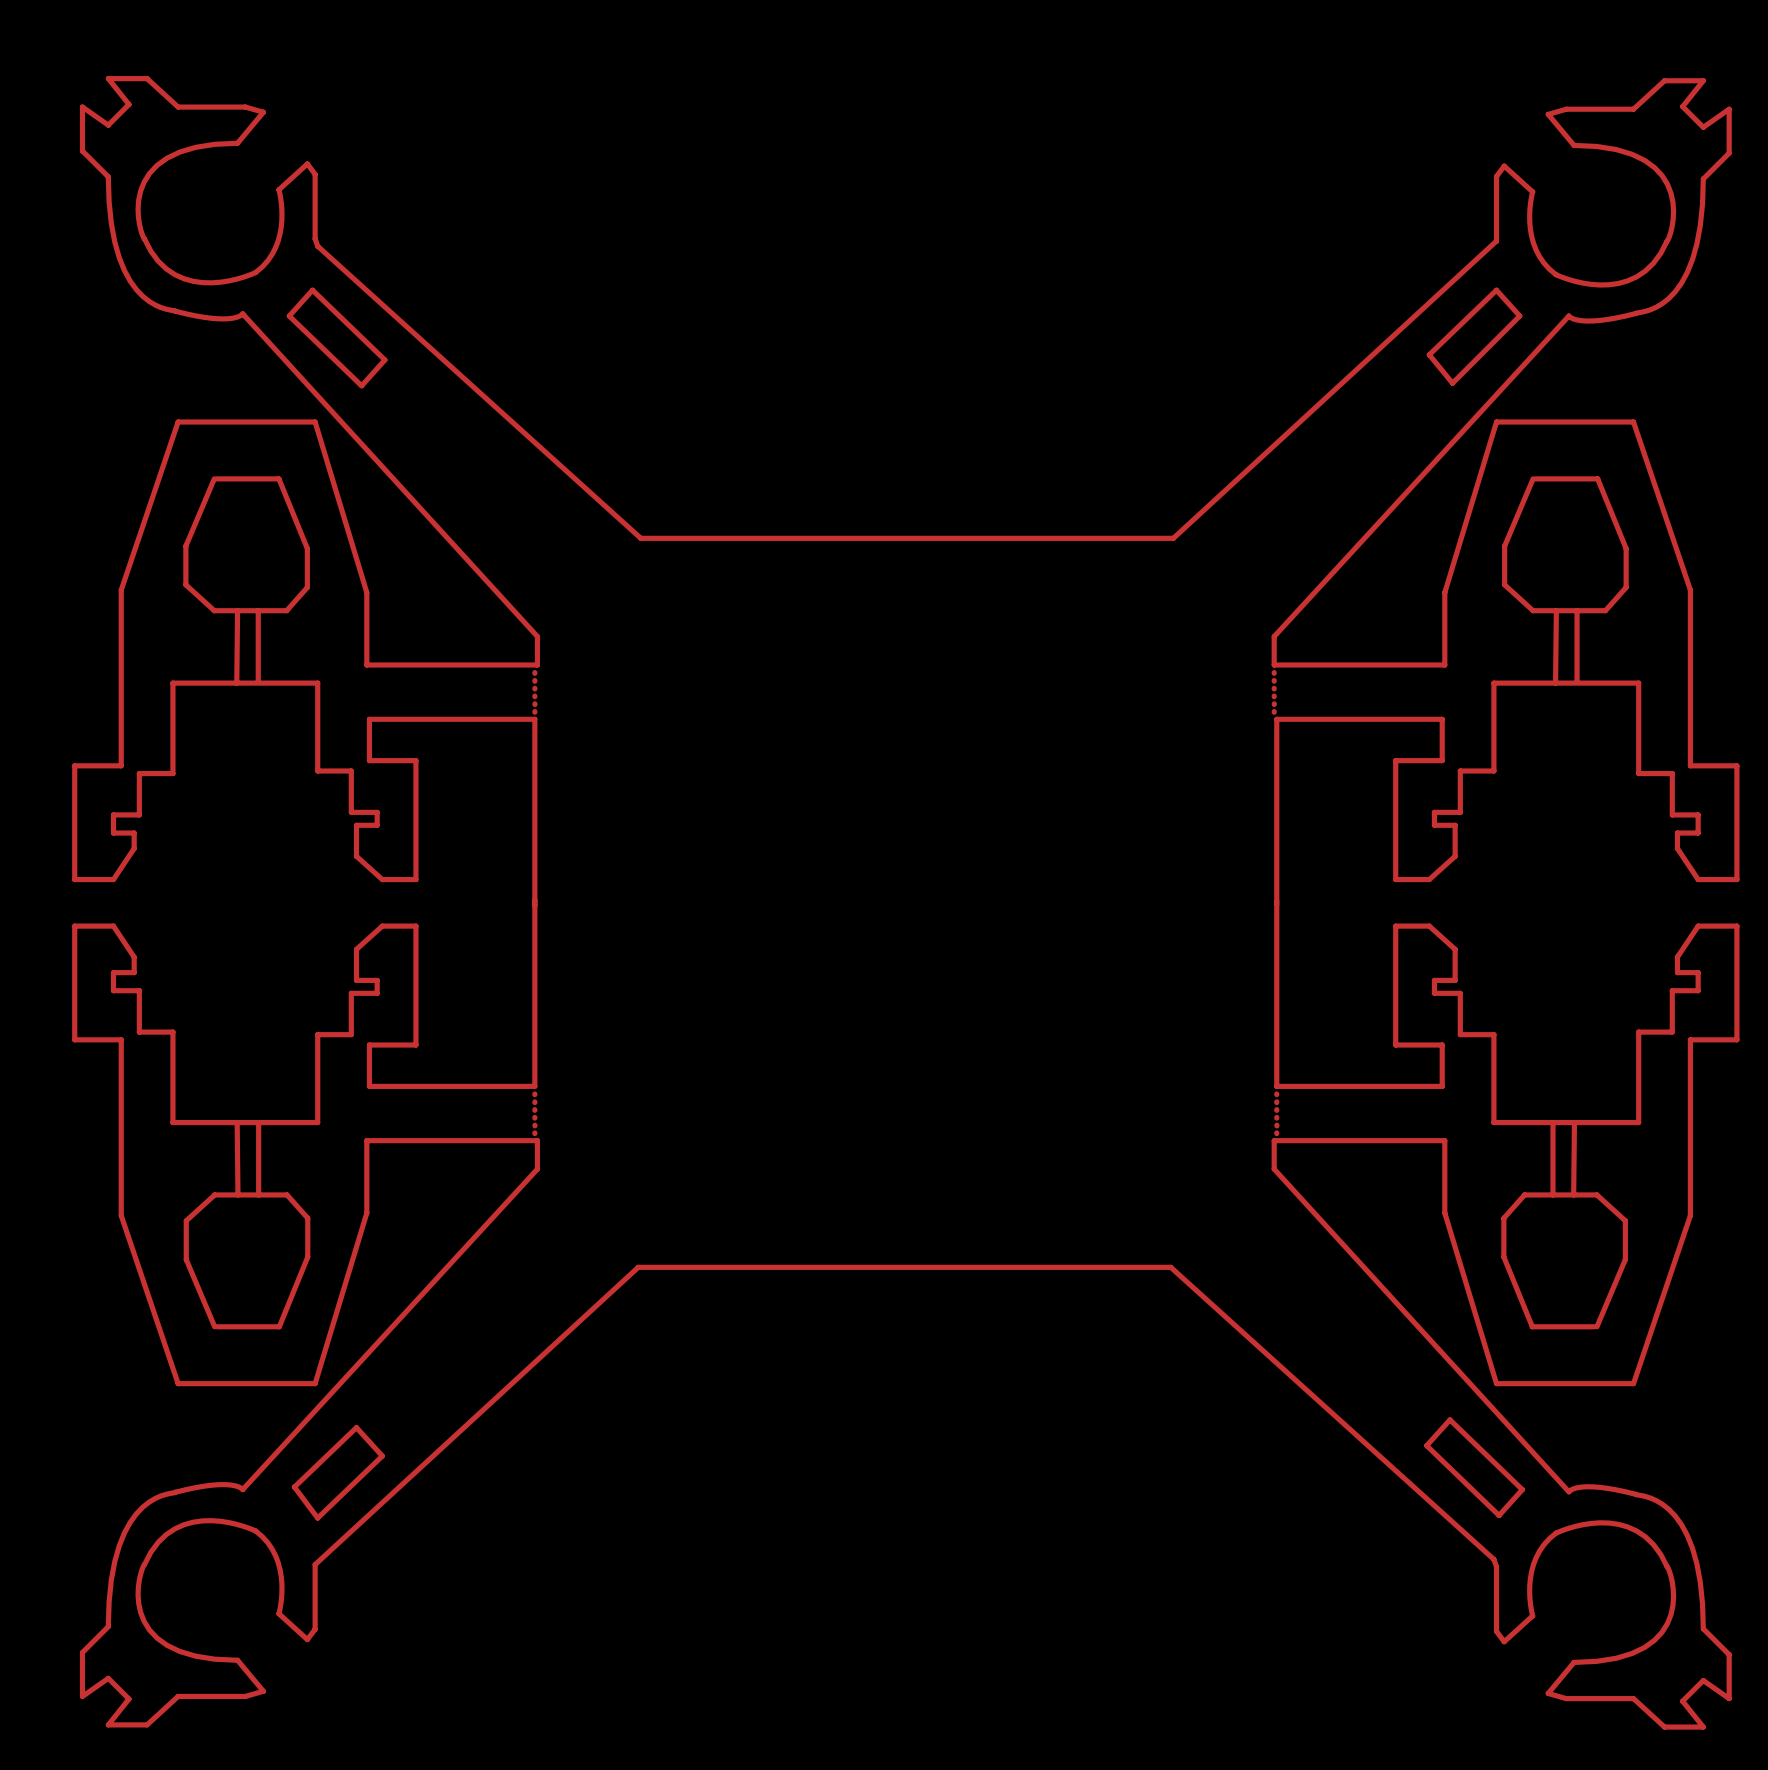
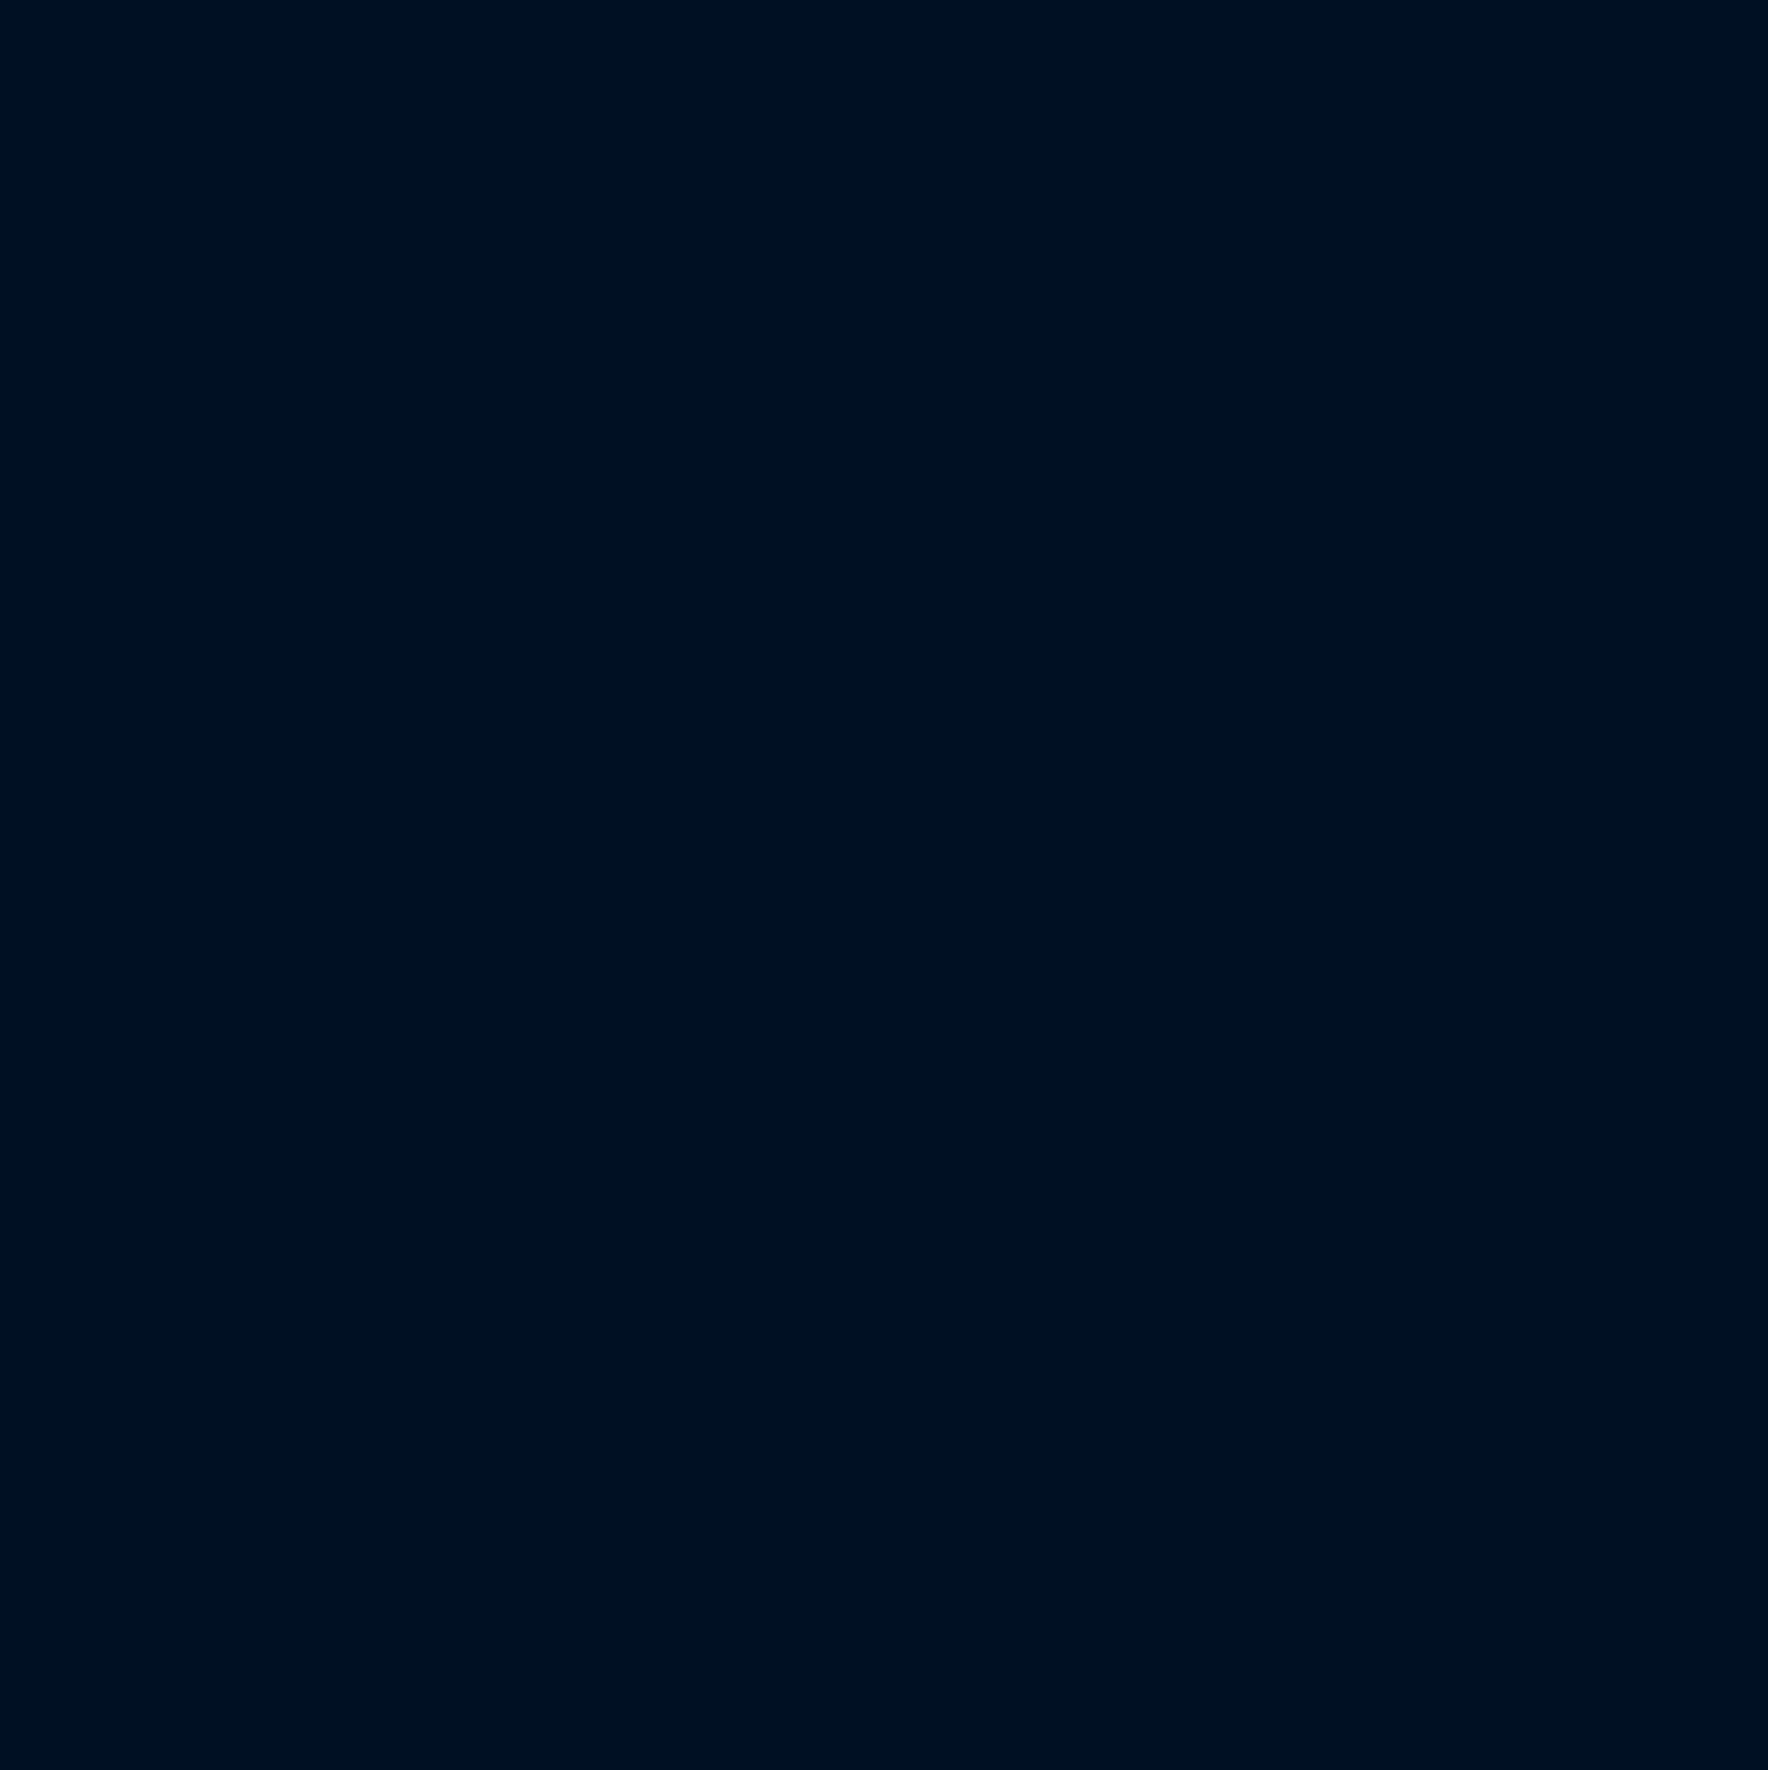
track: (108, 78) (147, 78) (178, 107) (245, 107) (263, 112) (237, 143) (214, 144) (179, 152) (157, 165) (144, 182) (138, 208) (140, 230) (150, 251) (166, 268) (184, 278) (202, 282) (228, 280) (255, 272) (267, 260) (278, 240) (282, 214) (278, 189) (307, 163) (315, 174) (315, 238) (317, 246) (640, 538) (1173, 538) (1496, 241) (1496, 176) (1504, 166) (1532, 191) (1529, 216) (1533, 242) (1543, 262) (1555, 274) (1582, 283) (1609, 284) (1627, 280) (1645, 271) (1660, 253) (1670, 232) (1673, 210) (1667, 184) (1654, 167) (1631, 154) (1596, 146) (1574, 145) (1548, 114) (1566, 109) (1633, 109) (1664, 80) (1703, 80) (1682, 106) (1703, 127) (1729, 109) (1729, 153) (1703, 179) (1702, 203) (1696, 243) (1687, 272) (1675, 291) (1656, 307) (1625, 316) (1588, 321) (1577, 319) (1568, 316) (1274, 636) (1274, 665) (1444, 665) (1444, 592) (1496, 422) (1633, 422) (1690, 590) (1690, 765) (1736, 765) (1736, 879) (1698, 879) (1677, 848) (1677, 833) (1698, 833) (1698, 814) (1672, 814) (1672, 773) (1638, 773) (1638, 683) (1493, 683) (1493, 770) (1460, 770) (1460, 812) (1434, 812) (1434, 825) (1455, 825) (1455, 856) (1429, 879) (1395, 879) (1395, 760) (1442, 760) (1442, 719) (1276, 719) (1276, 1086) (1442, 1086) (1442, 1045) (1395, 1045) (1395, 926) (1429, 926) (1455, 949) (1455, 980) (1434, 980) (1434, 993) (1460, 993) (1460, 1034) (1493, 1034) (1493, 1122) (1638, 1122) (1638, 1032) (1672, 1032) (1672, 990) (1698, 990) (1698, 972) (1677, 972) (1677, 957) (1698, 926) (1736, 926) (1736, 1039) (1690, 1039) (1690, 1215) (1633, 1383) (1496, 1383) (1444, 1213) (1444, 1140) (1274, 1140) (1274, 1169) (1568, 1491) (1577, 1487) (1588, 1486) (1625, 1491) (1656, 1500) (1675, 1515) (1687, 1535) (1696, 1563) (1702, 1603) (1703, 1628) (1729, 1654) (1729, 1698) (1703, 1680) (1682, 1701) (1703, 1727) (1664, 1727) (1633, 1698) (1566, 1698) (1548, 1693) (1574, 1662) (1596, 1661) (1631, 1653) (1654, 1640) (1667, 1623) (1673, 1597) (1670, 1575) (1660, 1554) (1645, 1536) (1627, 1526) (1609, 1523) (1582, 1524) (1555, 1533) (1543, 1544) (1533, 1564) (1529, 1591) (1532, 1615) (1504, 1641) (1496, 1631) (1496, 1566) (1493, 1559) (1170, 1267) (638, 1267) (315, 1564) (315, 1629) (307, 1639) (278, 1613) (282, 1589) (278, 1562) (267, 1542) (255, 1531) (228, 1522) (202, 1520) (184, 1524) (166, 1534) (150, 1552) (140, 1573) (138, 1594) (144, 1621) (157, 1638) (179, 1651) (214, 1659) (237, 1660) (263, 1691) (245, 1696) (178, 1696) (147, 1724) (108, 1724) (129, 1699) (108, 1678) (82, 1696) (82, 1652) (108, 1626) (109, 1601) (114, 1561) (124, 1533) (136, 1513) (155, 1498) (186, 1489) (222, 1484) (234, 1485) (242, 1489) (537, 1169) (537, 1140) (366, 1140) (366, 1213) (315, 1383) (178, 1383) (121, 1215) (121, 1039) (74, 1039) (74, 926) (113, 926) (134, 957) (134, 972) (113, 972) (113, 990) (139, 990) (139, 1032) (172, 1032) (172, 1122) (317, 1122) (317, 1034) (351, 1034) (351, 993) (377, 993) (377, 980) (356, 980) (356, 949) (382, 926) (415, 926) (415, 1045) (369, 1045) (369, 1086) (534, 1086) (534, 719) (369, 719) (369, 760) (415, 760) (415, 879) (382, 879) (356, 856) (356, 825) (377, 825) (377, 812) (351, 812) (351, 770) (317, 770) (317, 683) (172, 683) (172, 773) (139, 773) (139, 814) (113, 814) (113, 833) (134, 833) (134, 848) (113, 879) (74, 879) (74, 765) (121, 765) (121, 590) (178, 422) (315, 422) (366, 592) (366, 665) (537, 665) (537, 636) (242, 313) (234, 317) (222, 318) (186, 313) (155, 305) (136, 289) (124, 270) (114, 241) (109, 201) (108, 176) (82, 151) (82, 107) (108, 125) (129, 104) (108, 78) -> none
track: (312, 290) (289, 316) (361, 385) (384, 359) (312, 290) -> none
track: (1496, 290) (1429, 354) (1452, 383) (1519, 316) (1496, 290) -> none
track: (214, 478) (185, 546) (185, 584) (214, 610) (286, 610) (307, 587) (307, 548) (278, 478) (216, 478) -> none
track: (1533, 478) (1504, 546) (1504, 584) (1533, 610) (1605, 610) (1626, 587) (1626, 548) (1597, 478) (1535, 478) -> none
track: (237, 610) (236, 683) -> none
track: (258, 610) (258, 680) -> none
track: (1556, 610) (1555, 683) -> none
track: (1577, 610) (1577, 680) -> none
track: (534, 672) (534, 673) -> none
track: (1274, 672) (1274, 673) -> none
track: (534, 680) (534, 681) -> none
track: (1274, 680) (1274, 681) -> none
track: (534, 688) (534, 688) -> none
track: (1274, 688) (1274, 688) -> none
track: (534, 696) (534, 696) -> none
track: (1274, 696) (1274, 696) -> none
track: (534, 703) (534, 704) -> none
track: (1274, 703) (1274, 704) -> none
track: (534, 711) (534, 712) -> none
track: (1274, 711) (1274, 712) -> none
track: (534, 1093) (534, 1094) -> none
track: (1276, 1093) (1276, 1094) -> none
track: (534, 1101) (534, 1102) -> none
track: (1276, 1101) (1276, 1102) -> none
track: (534, 1109) (534, 1110) -> none
track: (1276, 1109) (1276, 1110) -> none
track: (534, 1117) (534, 1118) -> none
track: (1276, 1117) (1276, 1118) -> none
track: (237, 1122) (237, 1194) -> none
track: (1574, 1122) (1573, 1194) -> none
track: (258, 1125) (258, 1194) -> none
track: (534, 1125) (534, 1125) -> none
track: (1276, 1125) (1276, 1125) -> none
track: (1552, 1125) (1552, 1194) -> none
track: (534, 1132) (534, 1133) -> none
track: (1276, 1132) (1276, 1133) -> none
track: (214, 1326) (186, 1259) (186, 1220) (214, 1194) (287, 1194) (307, 1218) (307, 1256) (279, 1326) (217, 1326) -> none
track: (1594, 1326) (1532, 1326) (1503, 1256) (1503, 1218) (1524, 1194) (1596, 1194) (1625, 1220) (1625, 1259) (1596, 1326) -> none
track: (1449, 1419) (1426, 1445) (1499, 1515) (1522, 1489) (1449, 1419) -> none
track: (356, 1427) (294, 1487) (317, 1518) (382, 1456) (356, 1427) -> none

